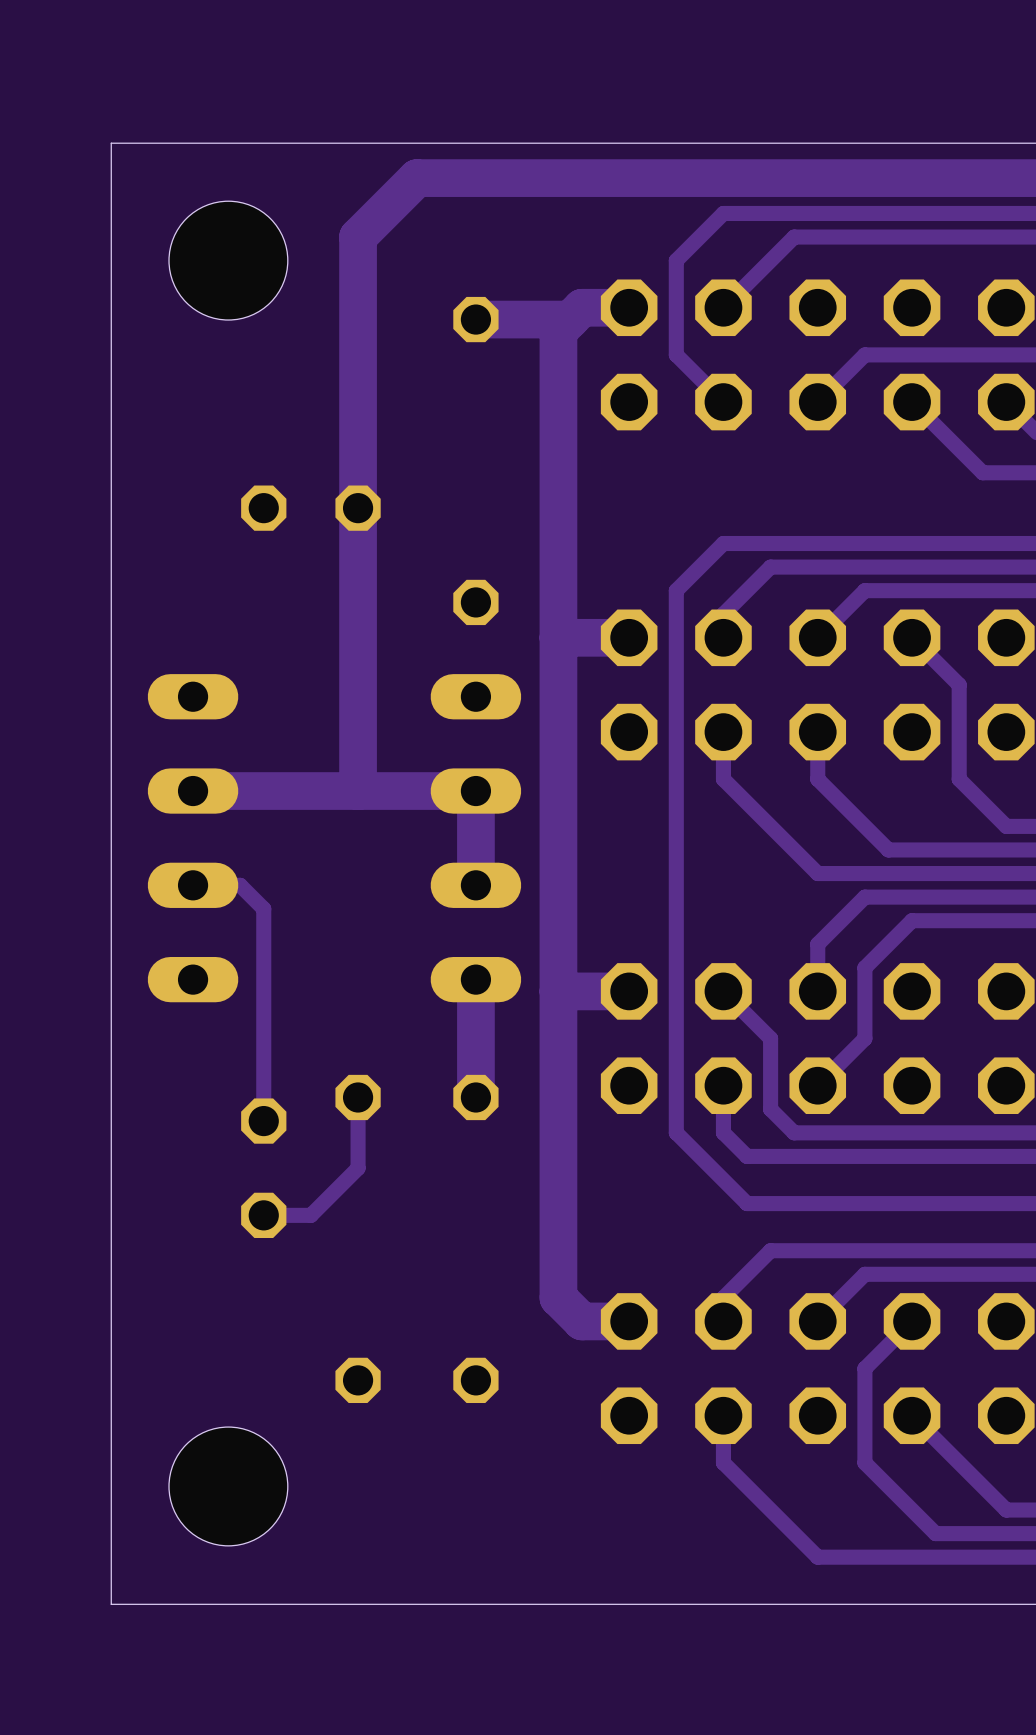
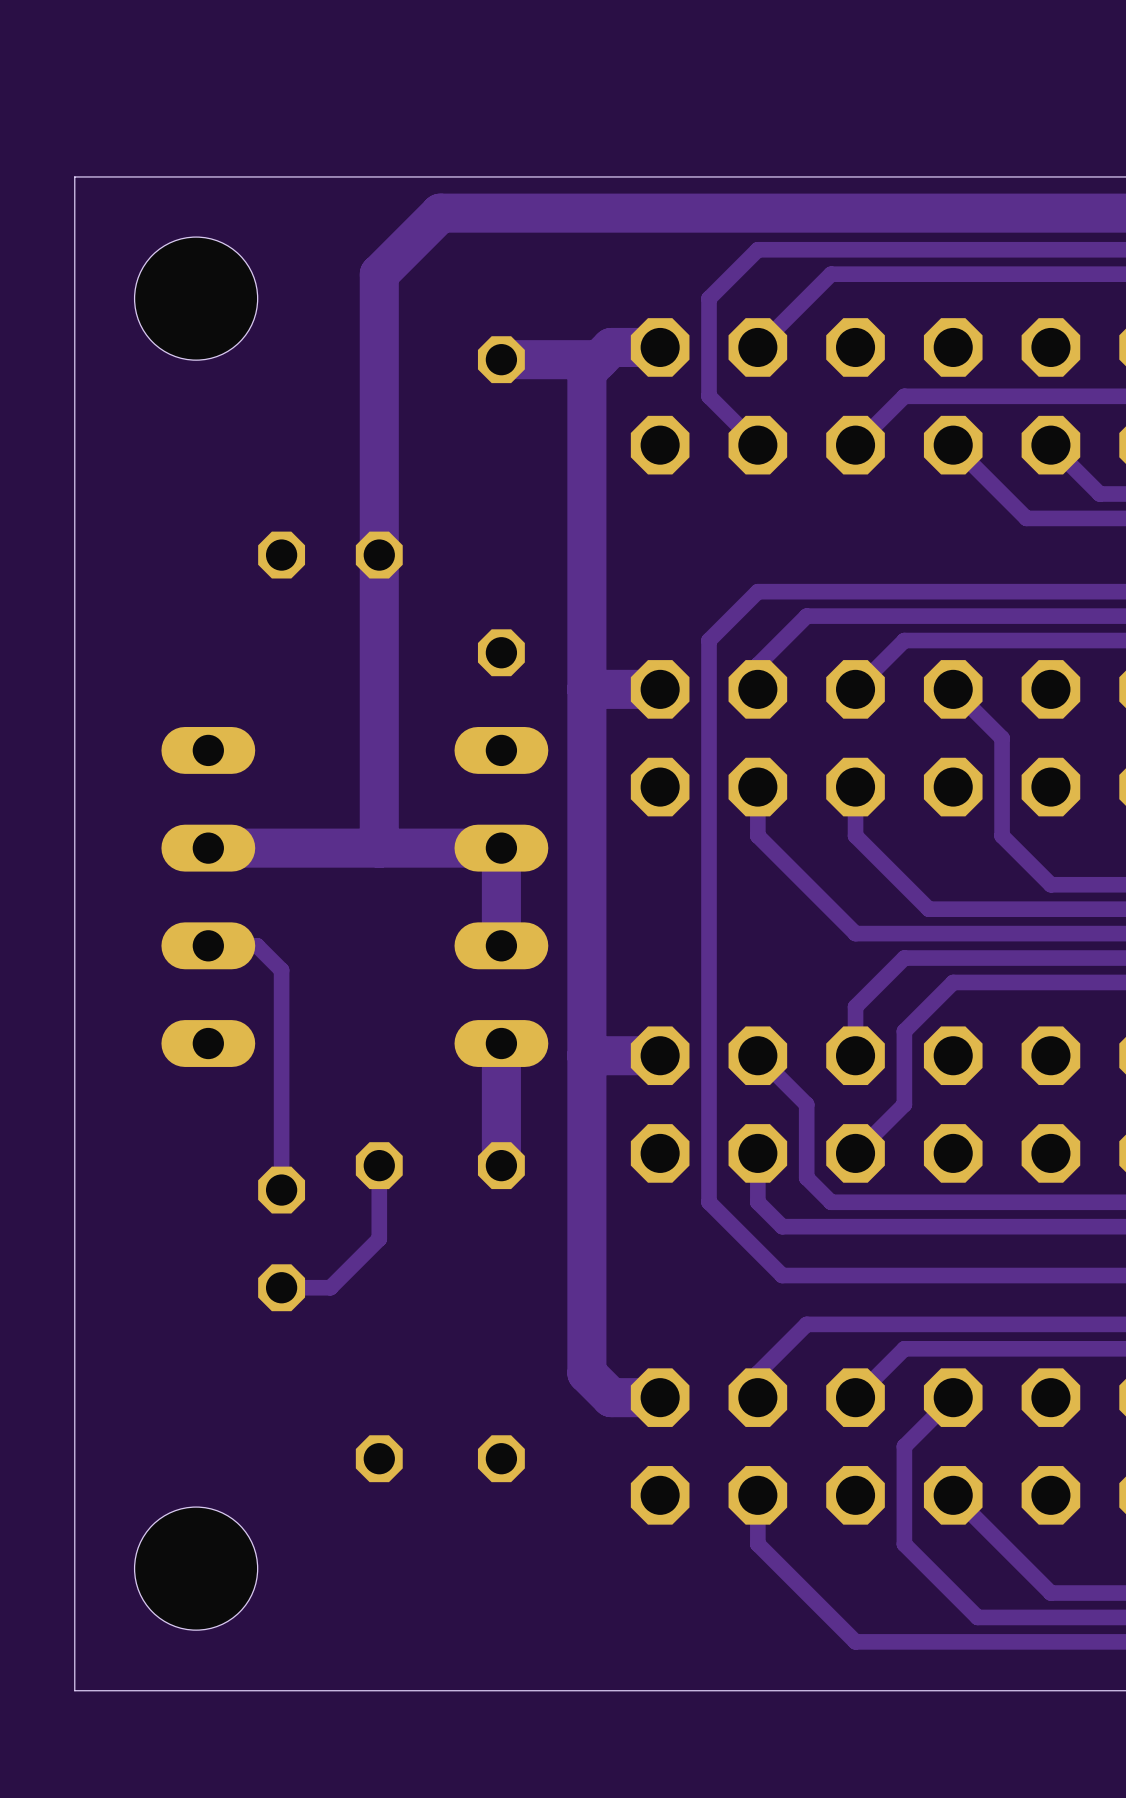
board edge: (111, 143) (111, 1604) -> (123, 176) (74, 176) (74, 1690) (123, 1690)
hole position: (228, 260) -> (196, 298)
hole position: (228, 1486) -> (196, 1568)

